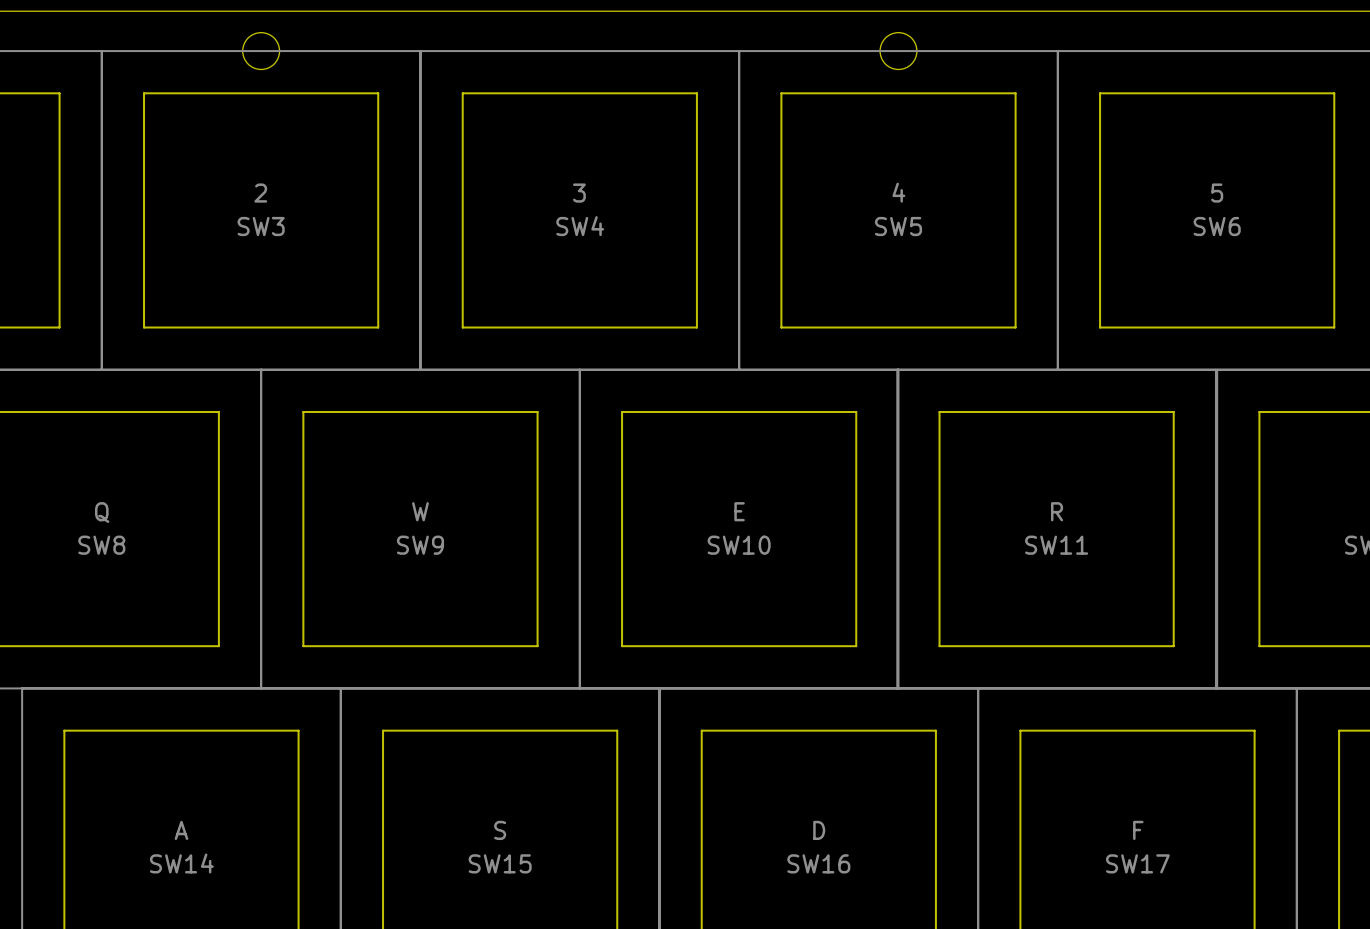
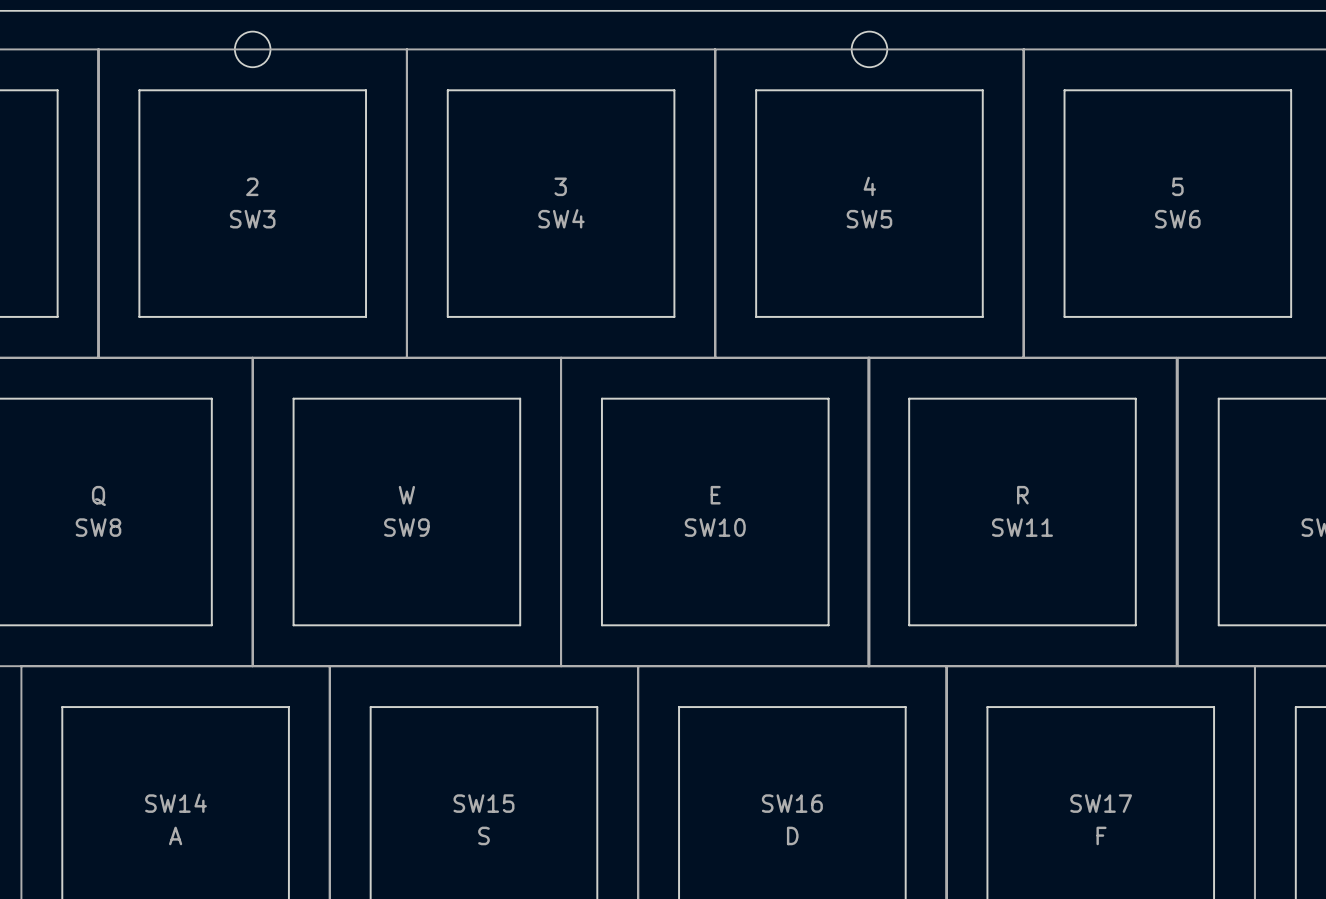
SW14 value position: A (181, 830) -> A (175, 835)
SW15 value position: S (500, 830) -> S (483, 835)
SW16 value position: D (819, 830) -> D (792, 835)
SW17 value position: F (1138, 830) -> F (1101, 835)
SW14 name position: SW14 (181, 863) -> SW14 (175, 803)
SW15 name position: SW15 (500, 863) -> SW15 (483, 803)
SW16 name position: SW16 (818, 863) -> SW16 (792, 803)
SW17 name position: SW17 (1137, 863) -> SW17 (1101, 803)

